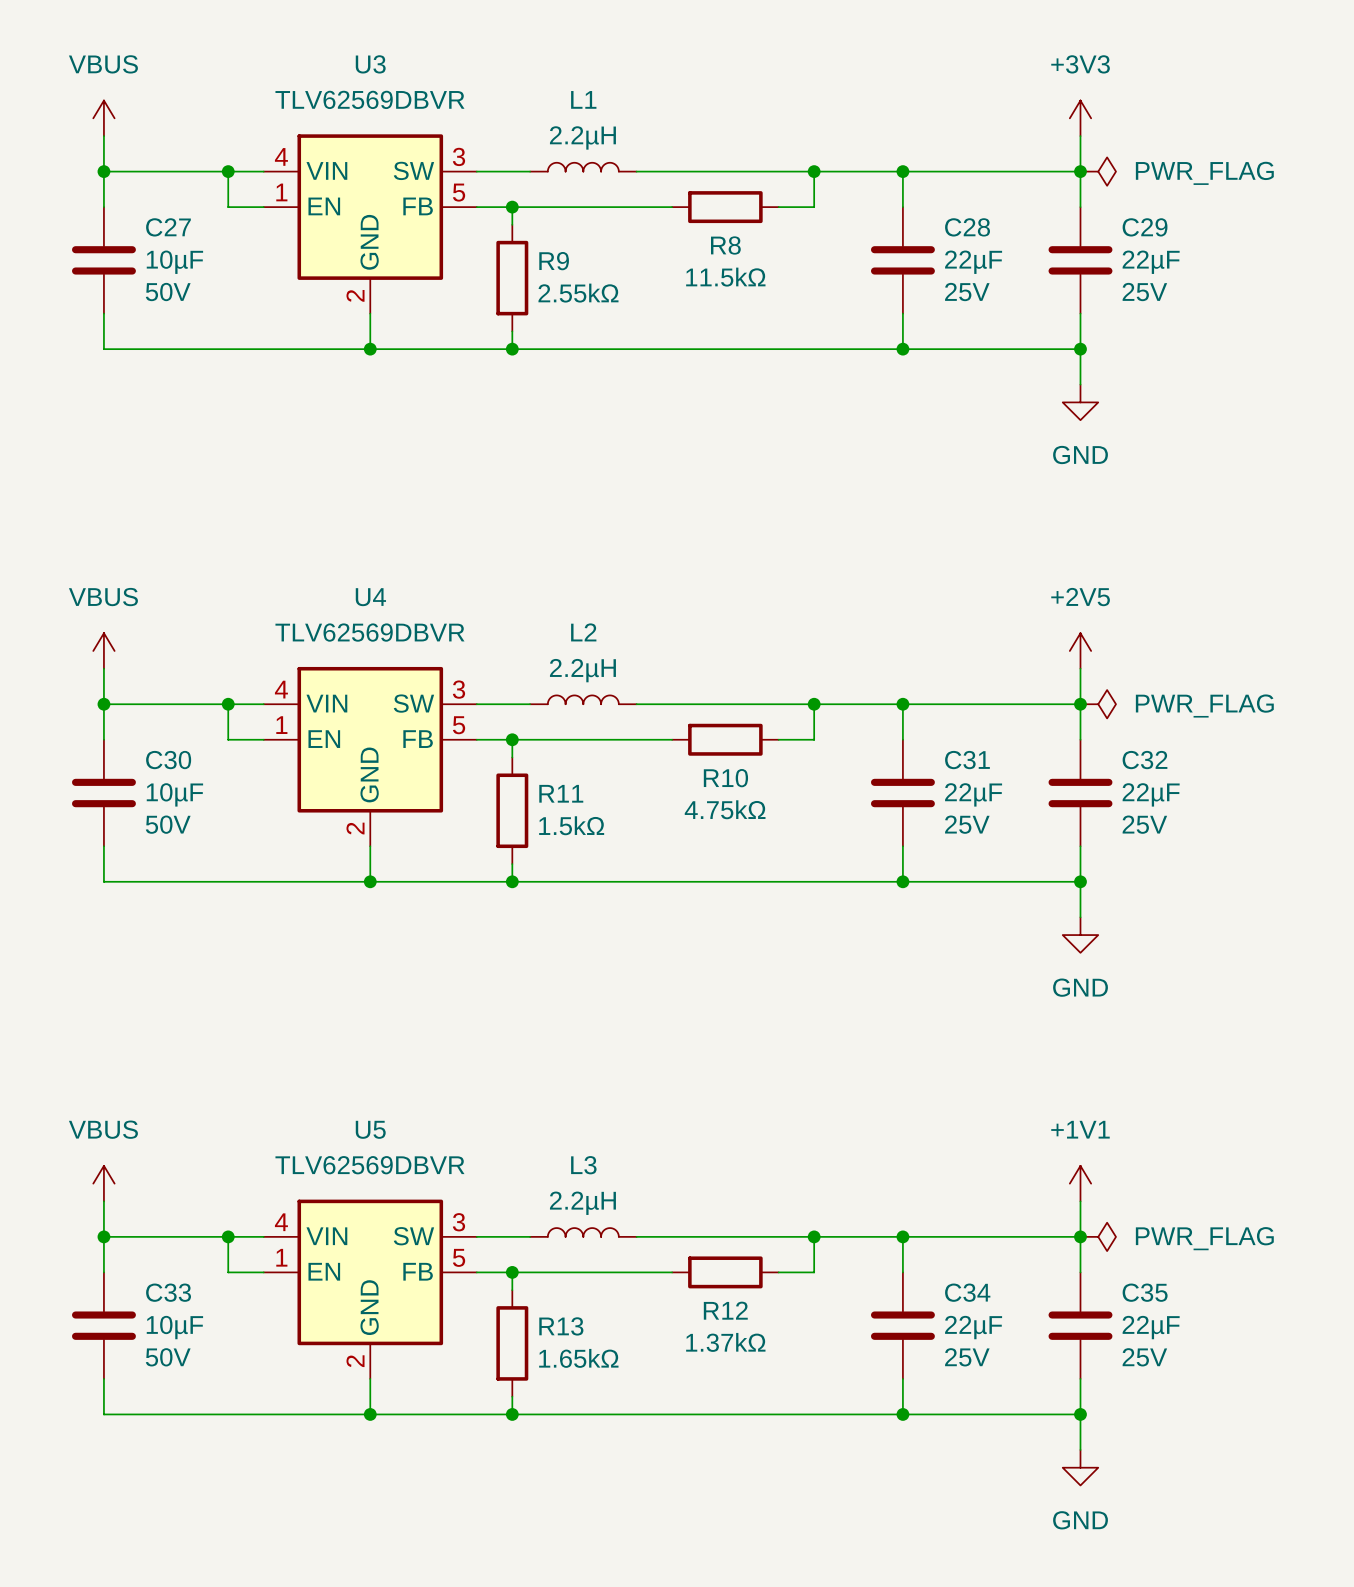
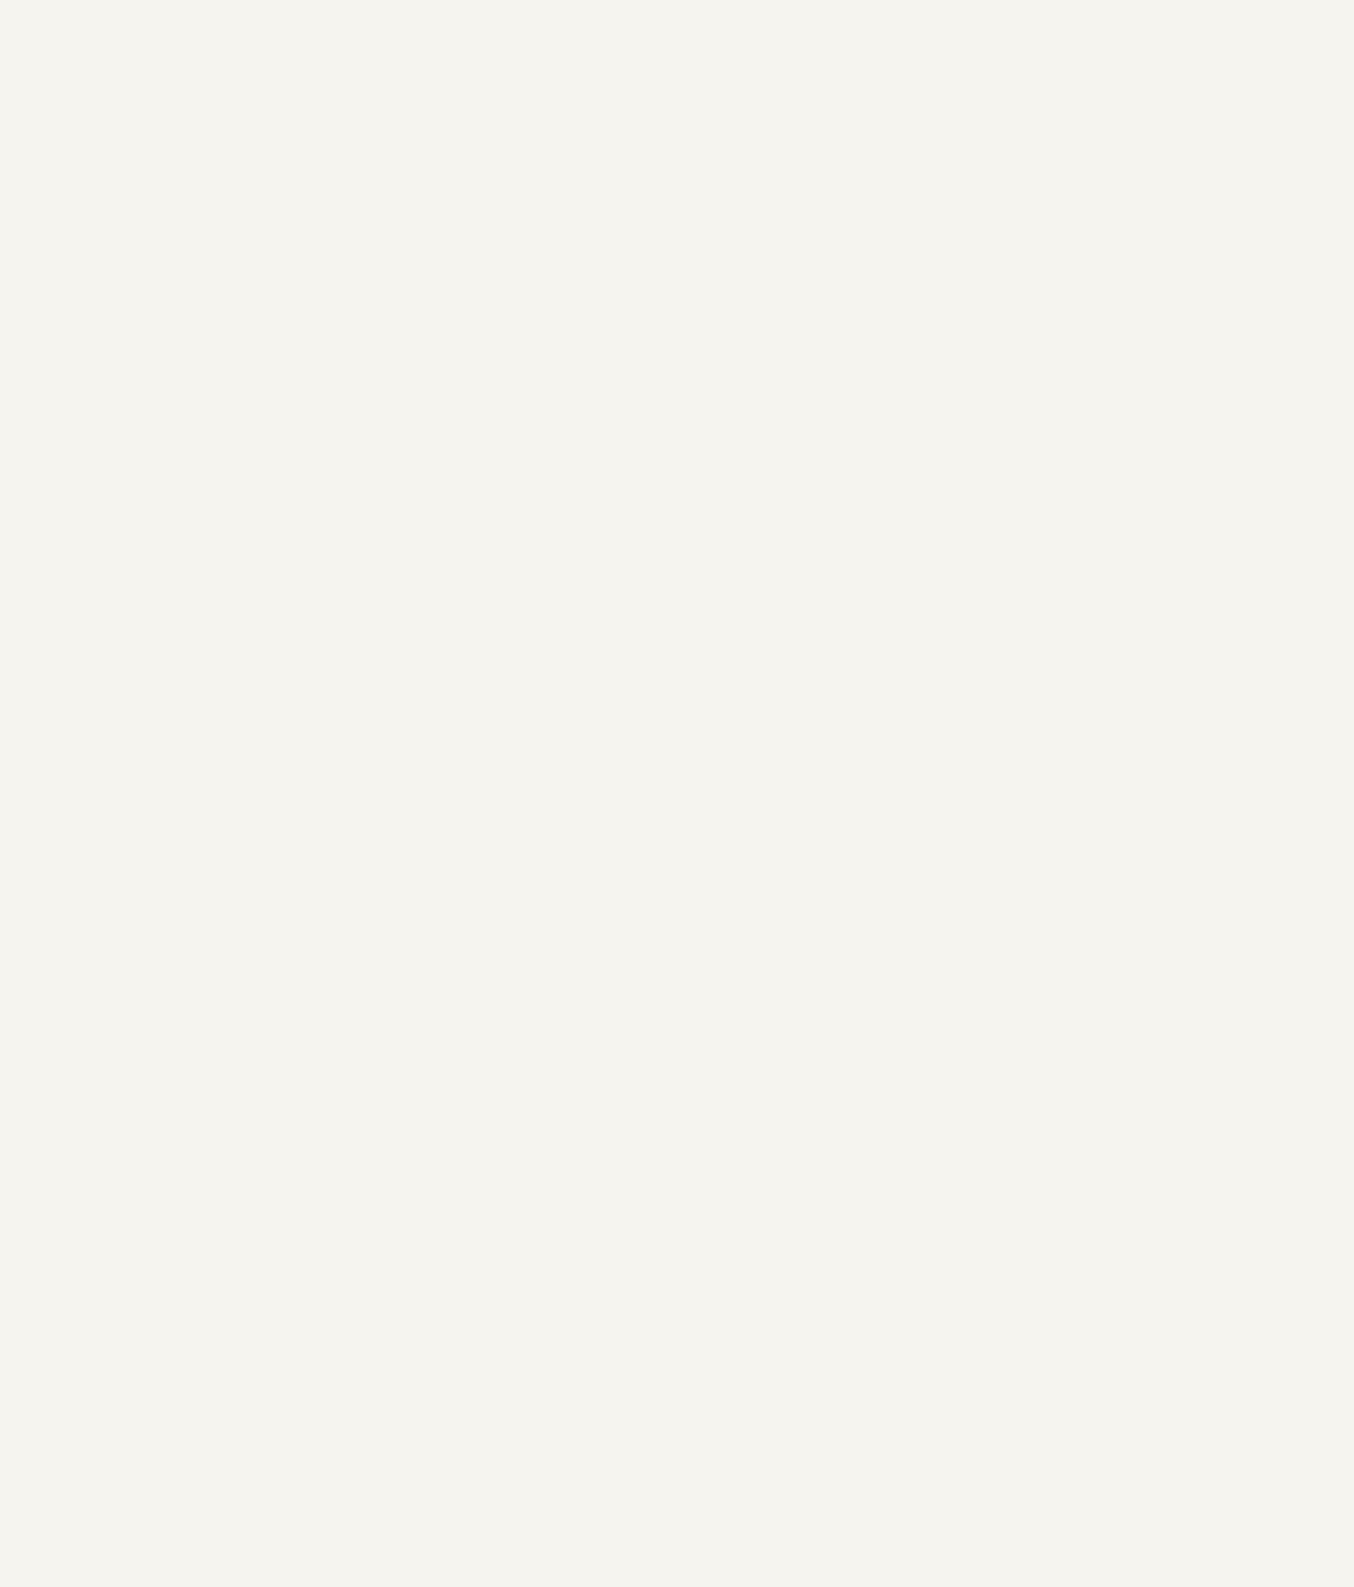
power symbol: VBUS (103, 118) -> none
power symbol: +3V3 (1080, 118) -> none
wire: (103, 136) (103, 207) -> none
wire: (1080, 136) (1080, 207) -> none
L1: 2.2µH (583, 167) -> none
wire: (103, 171) (263, 171) -> none
junction: (103, 171) -> none
wire: (228, 171) (228, 207) (263, 207) -> none
junction: (228, 171) -> none
wire: (476, 171) (530, 171) -> none
wire: (636, 171) (1080, 171) -> none
wire: (814, 171) (814, 207) (778, 207) -> none
junction: (814, 171) -> none
wire: (902, 171) (902, 207) -> none
junction: (902, 171) -> none
junction: (1080, 171) -> none
power symbol: PWR_FLAG (1098, 171) -> none
wire: (476, 207) (672, 207) -> none
wire: (512, 207) (512, 224) -> none
junction: (512, 207) -> none
R8: 11.5kΩ (725, 207) -> none
U3: TLV62569DBVR (370, 223) -> none
C27: 10µF (103, 260) -> none
C28: 22µF (902, 260) -> none
C29: 22µF (1080, 260) -> none
R9: 2.55kΩ (512, 278) -> none
wire: (103, 313) (103, 349) (1080, 349) -> none
wire: (370, 313) (370, 349) -> none
wire: (902, 313) (902, 349) -> none
wire: (1080, 313) (1080, 384) -> none
wire: (512, 331) (512, 349) -> none
junction: (370, 349) -> none
junction: (512, 349) -> none
junction: (902, 349) -> none
junction: (1080, 349) -> none
power symbol: GND (1080, 402) -> none
power symbol: VBUS (103, 650) -> none
power symbol: +2V5 (1080, 650) -> none
wire: (103, 668) (103, 739) -> none
wire: (1080, 668) (1080, 739) -> none
L2: 2.2µH (583, 699) -> none
wire: (103, 704) (263, 704) -> none
junction: (103, 704) -> none
wire: (228, 704) (228, 739) (263, 739) -> none
junction: (228, 704) -> none
wire: (476, 704) (530, 704) -> none
wire: (636, 704) (1080, 704) -> none
wire: (814, 704) (814, 739) (778, 739) -> none
junction: (814, 704) -> none
wire: (902, 704) (902, 739) -> none
junction: (902, 704) -> none
junction: (1080, 704) -> none
power symbol: PWR_FLAG (1098, 704) -> none
wire: (476, 739) (672, 739) -> none
wire: (512, 739) (512, 757) -> none
junction: (512, 739) -> none
R10: 4.75kΩ (725, 739) -> none
U4: TLV62569DBVR (370, 756) -> none
C30: 10µF (103, 793) -> none
C31: 22µF (902, 793) -> none
C32: 22µF (1080, 793) -> none
R11: 1.5kΩ (512, 810) -> none
wire: (103, 846) (103, 881) (1080, 881) -> none
wire: (370, 846) (370, 881) -> none
wire: (902, 846) (902, 881) -> none
wire: (1080, 846) (1080, 917) -> none
wire: (512, 864) (512, 881) -> none
junction: (370, 881) -> none
junction: (512, 881) -> none
junction: (902, 881) -> none
junction: (1080, 881) -> none
power symbol: GND (1080, 935) -> none
power symbol: VBUS (103, 1183) -> none
power symbol: +1V1 (1080, 1183) -> none
wire: (103, 1201) (103, 1272) -> none
wire: (1080, 1201) (1080, 1272) -> none
L3: 2.2µH (583, 1232) -> none
wire: (103, 1236) (263, 1236) -> none
junction: (103, 1236) -> none
wire: (228, 1236) (228, 1272) (263, 1272) -> none
junction: (228, 1236) -> none
wire: (476, 1236) (530, 1236) -> none
wire: (636, 1236) (1080, 1236) -> none
wire: (814, 1236) (814, 1272) (778, 1272) -> none
junction: (814, 1236) -> none
wire: (902, 1236) (902, 1272) -> none
junction: (902, 1236) -> none
junction: (1080, 1236) -> none
power symbol: PWR_FLAG (1098, 1236) -> none
wire: (476, 1272) (672, 1272) -> none
wire: (512, 1272) (512, 1290) -> none
junction: (512, 1272) -> none
R12: 1.37kΩ (725, 1272) -> none
U5: TLV62569DBVR (370, 1289) -> none
C33: 10µF (103, 1325) -> none
C34: 22µF (902, 1325) -> none
C35: 22µF (1080, 1325) -> none
R13: 1.65kΩ (512, 1343) -> none
wire: (103, 1378) (103, 1414) (1080, 1414) -> none
wire: (370, 1378) (370, 1414) -> none
wire: (902, 1378) (902, 1414) -> none
wire: (1080, 1378) (1080, 1449) -> none
wire: (512, 1396) (512, 1414) -> none
junction: (370, 1414) -> none
junction: (512, 1414) -> none
junction: (902, 1414) -> none
junction: (1080, 1414) -> none
power symbol: GND (1080, 1467) -> none

